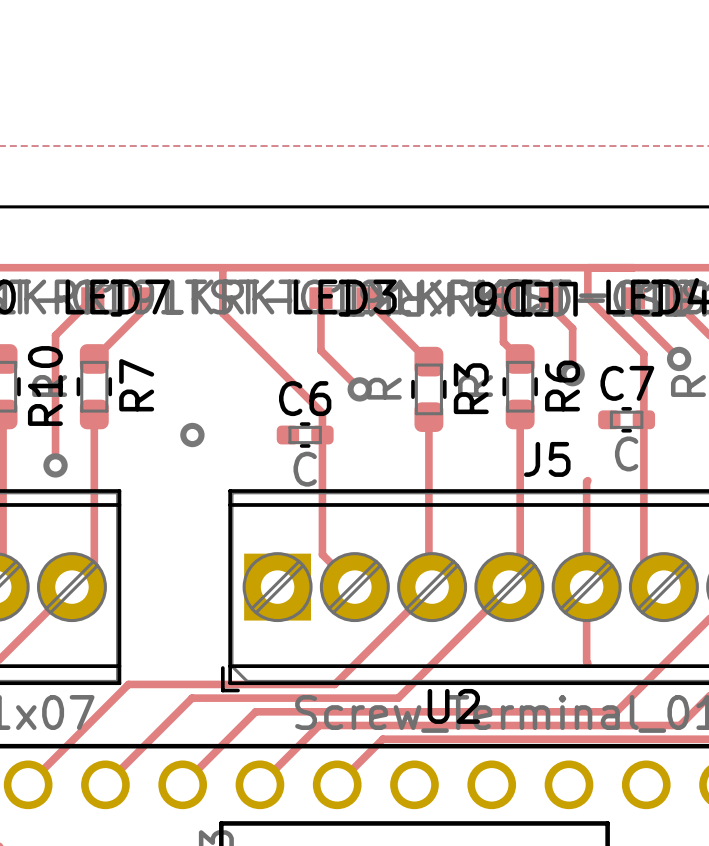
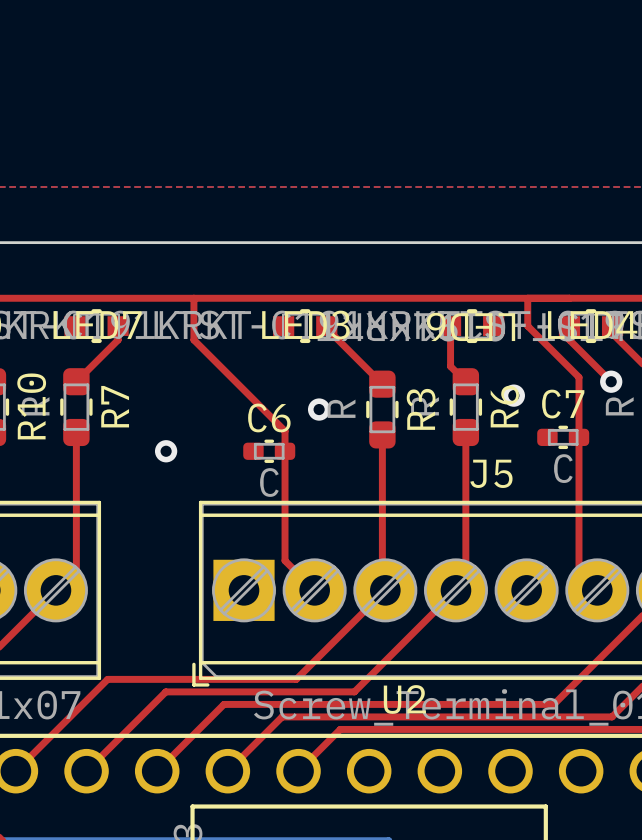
top track: (92, 298) (55, 335) (55, 465) -> none
top track: (320, 298) (320, 350) (359, 389) -> none
top track: (550, 298) (550, 306) (572, 328) (572, 374) -> none
via: (55, 465) -> none
top track: (587, 480) (587, 663) -> none

